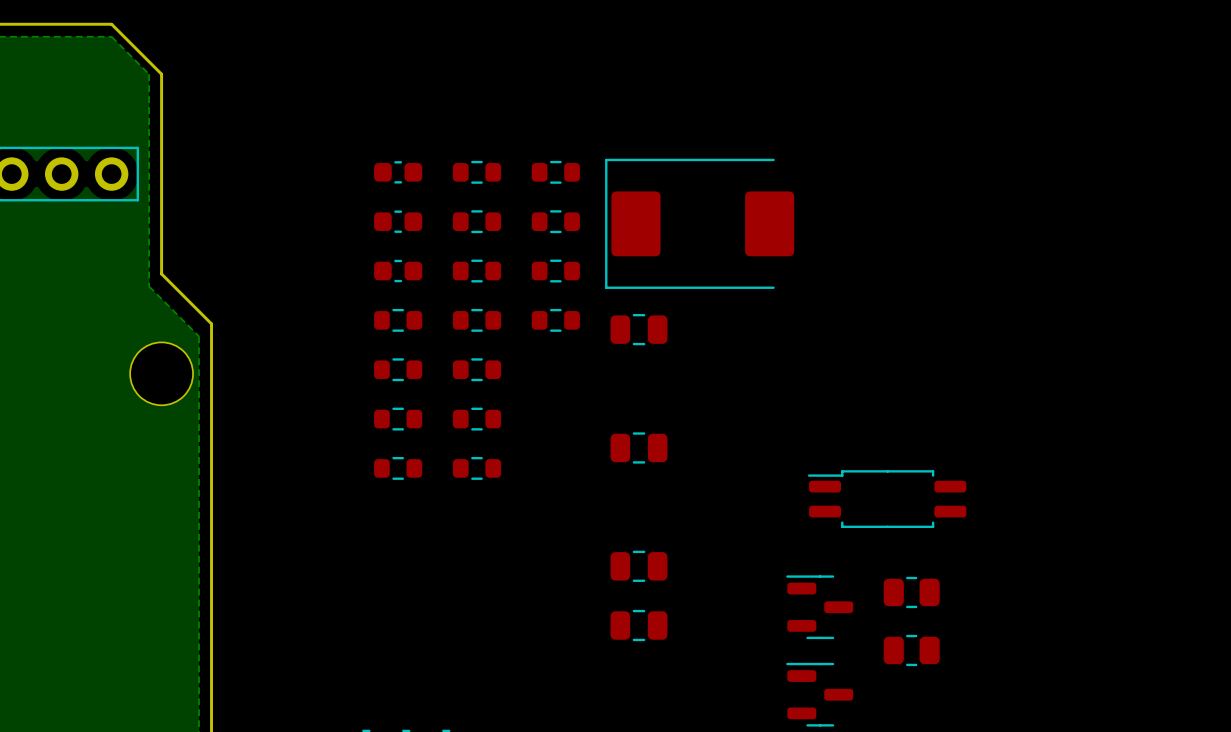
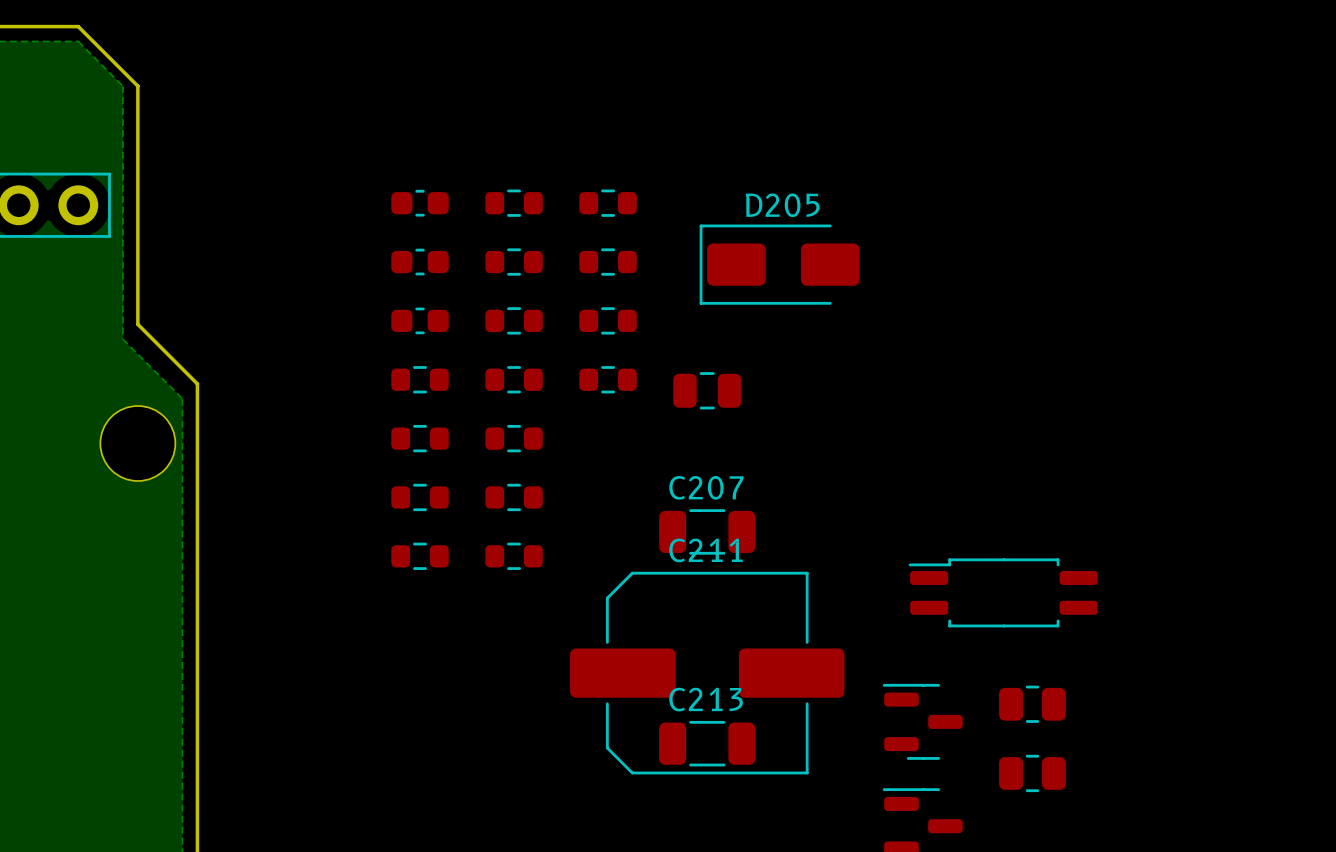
part: (699, 223) -> none
D205: none -> (779, 264)
part: (639, 447) -> none
C207: none -> (707, 531)
part: (639, 566) -> none
C211: none -> (707, 673)
part: (639, 625) -> none
C213: none -> (707, 743)

